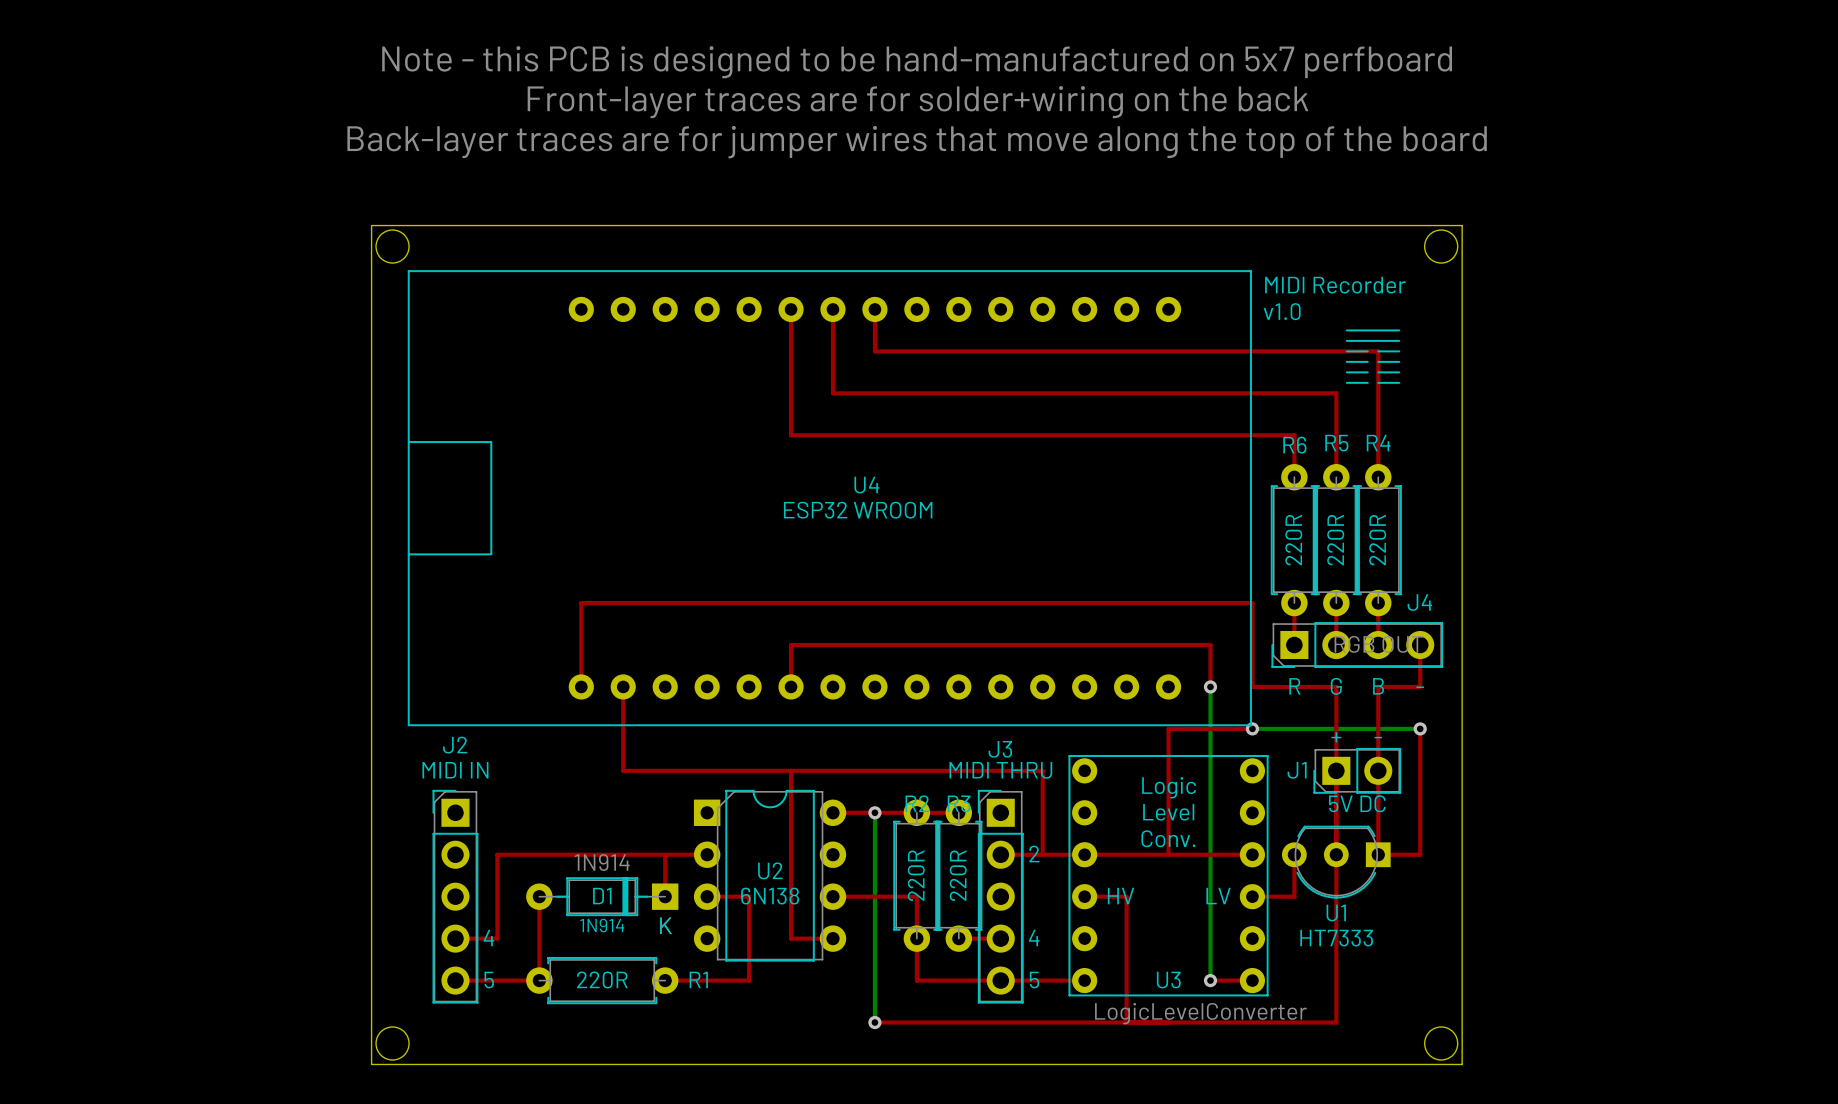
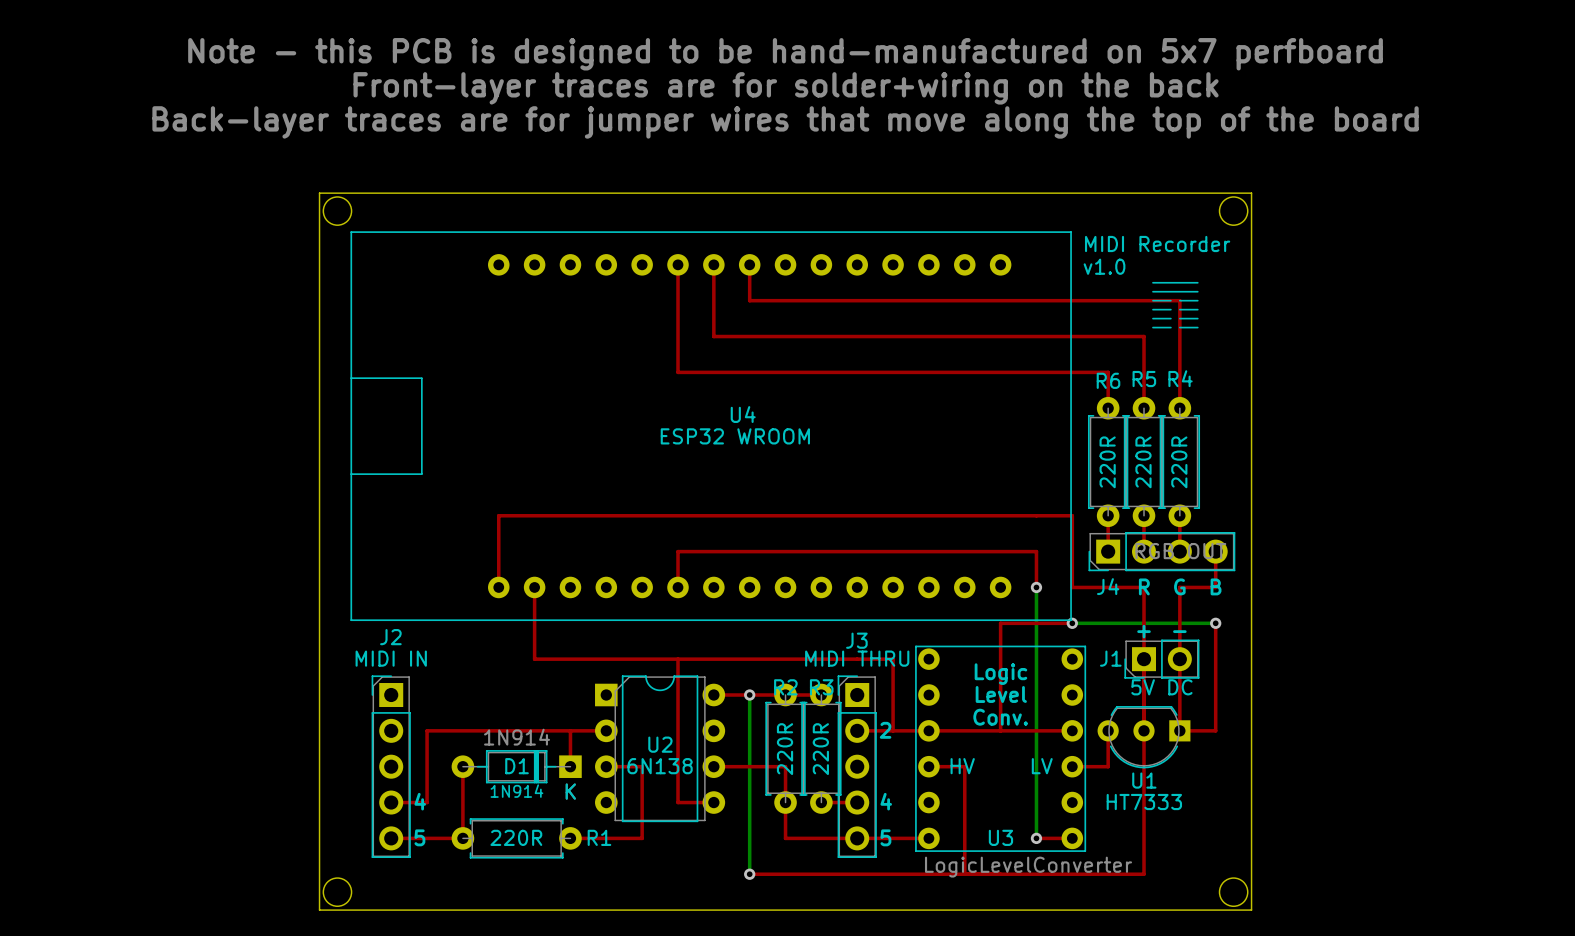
J4 name position: J4 (1419, 602) -> J4 (1108, 586)
text: R (1294, 686) -> none
text: G (1336, 686) -> R (1144, 586)
text: B (1378, 686) -> G (1179, 586)
text: - (1420, 687) -> B (1216, 586)

